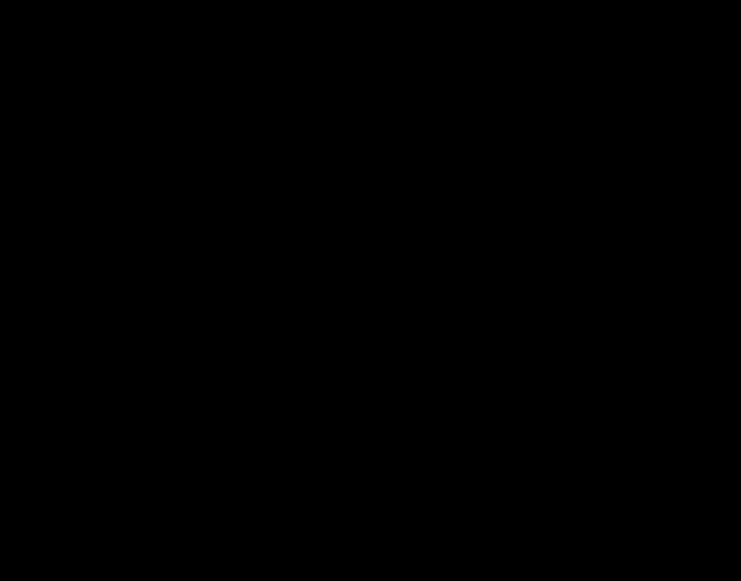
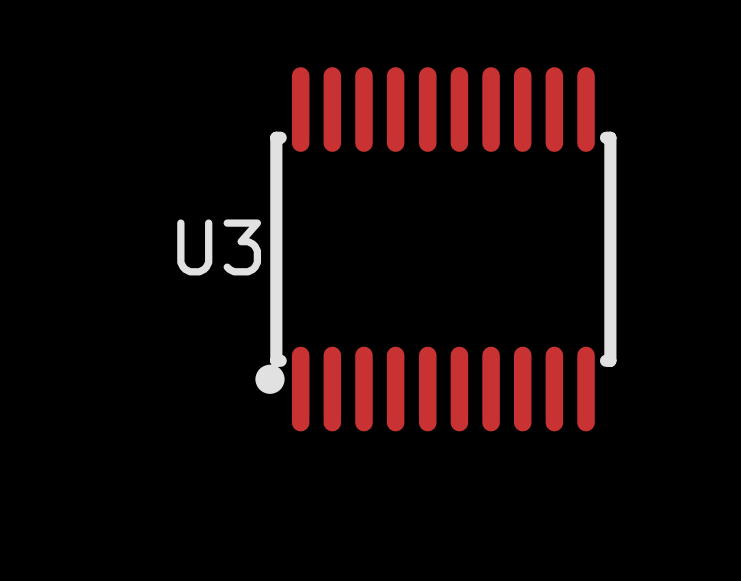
U3: none -> (435, 249)

